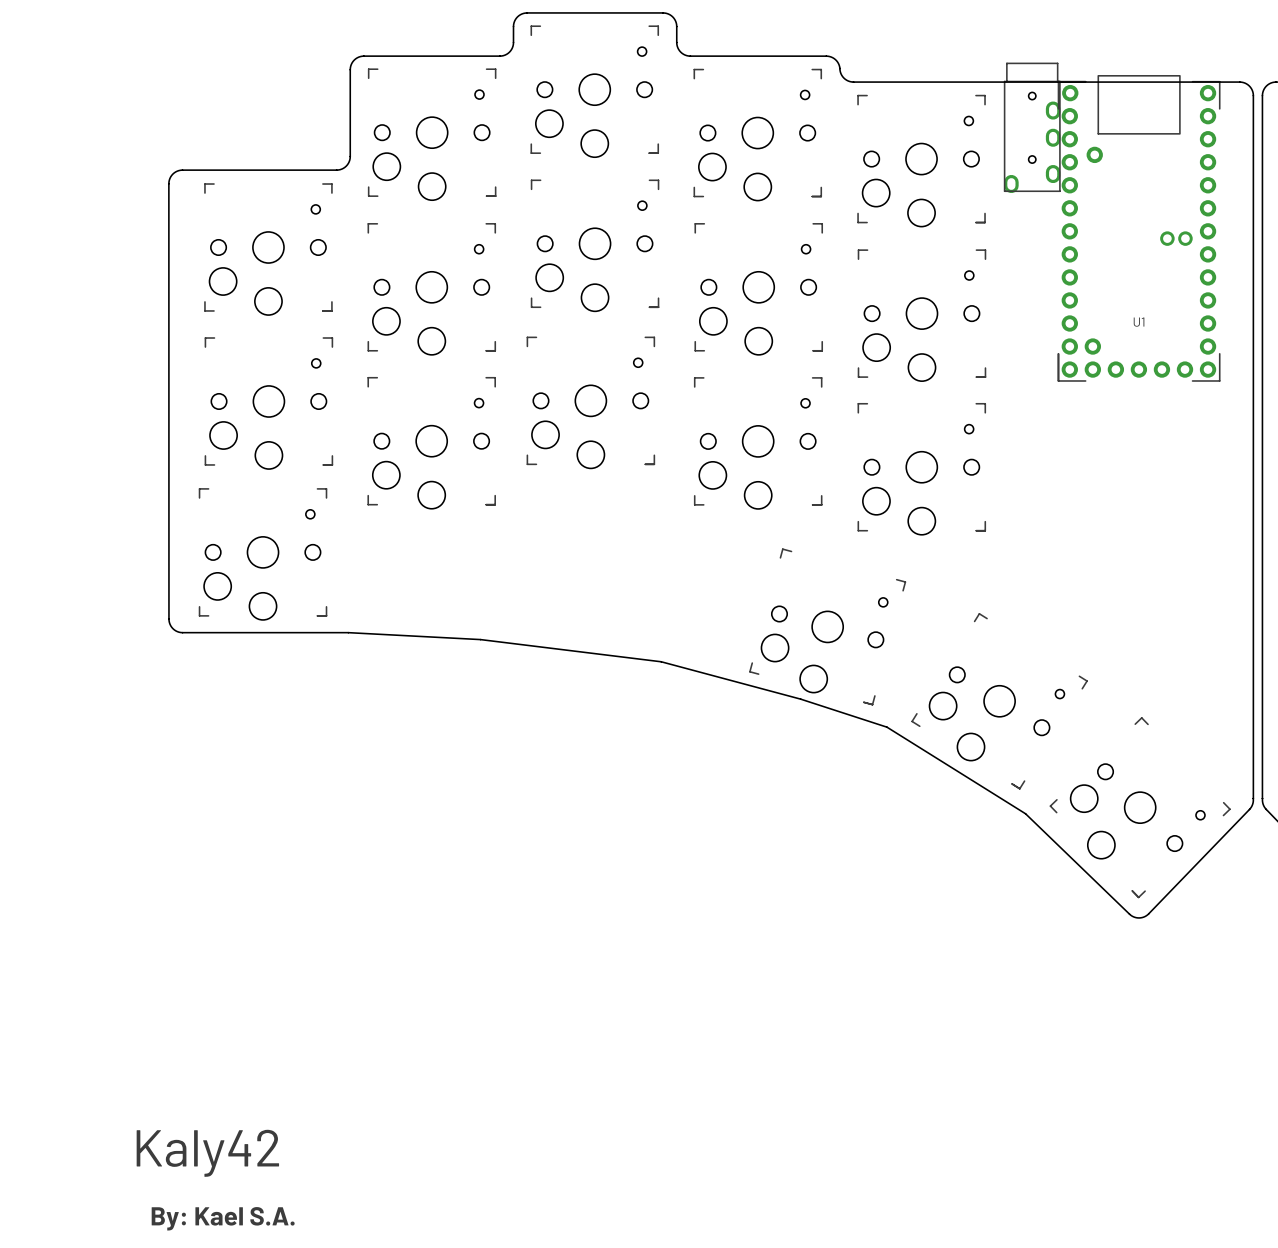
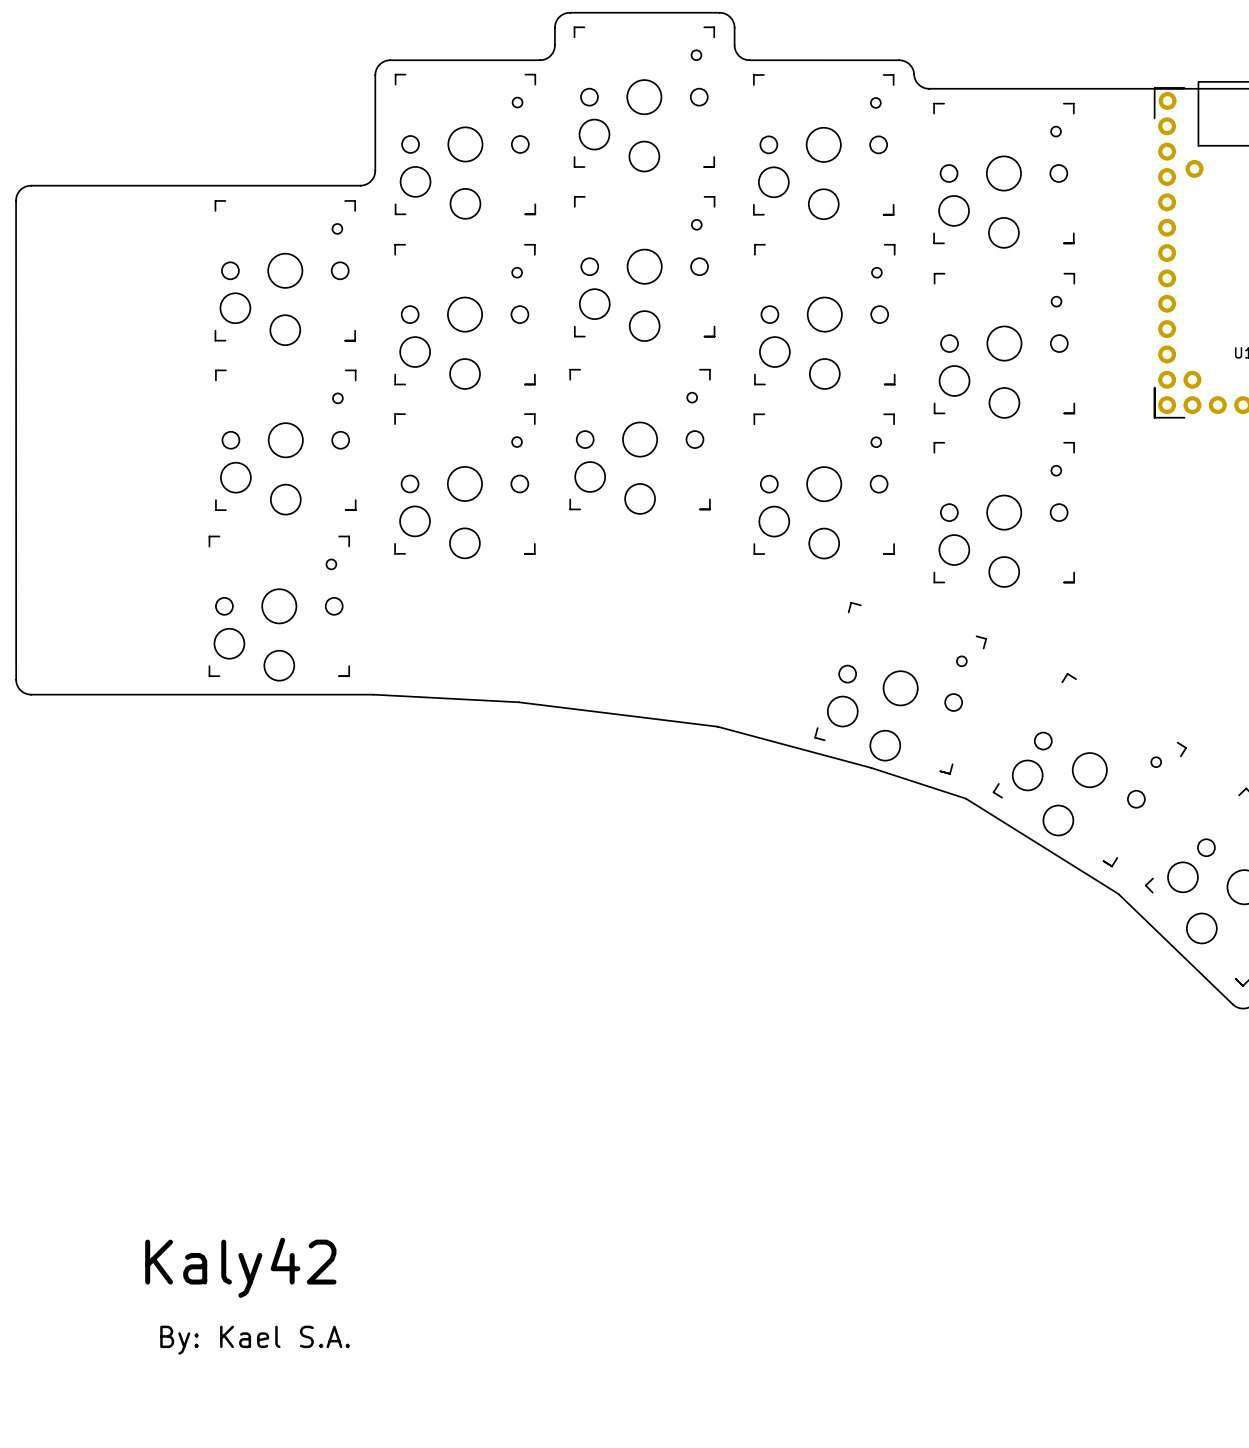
part: (1032, 127) -> none
board edge: (182, 170) (172, 174) (168, 183) (168, 619) (172, 628) (182, 632) -> (190, 185) (29, 185) (20, 190) (16, 200) (17, 685) (22, 691) (31, 694) (190, 694)

